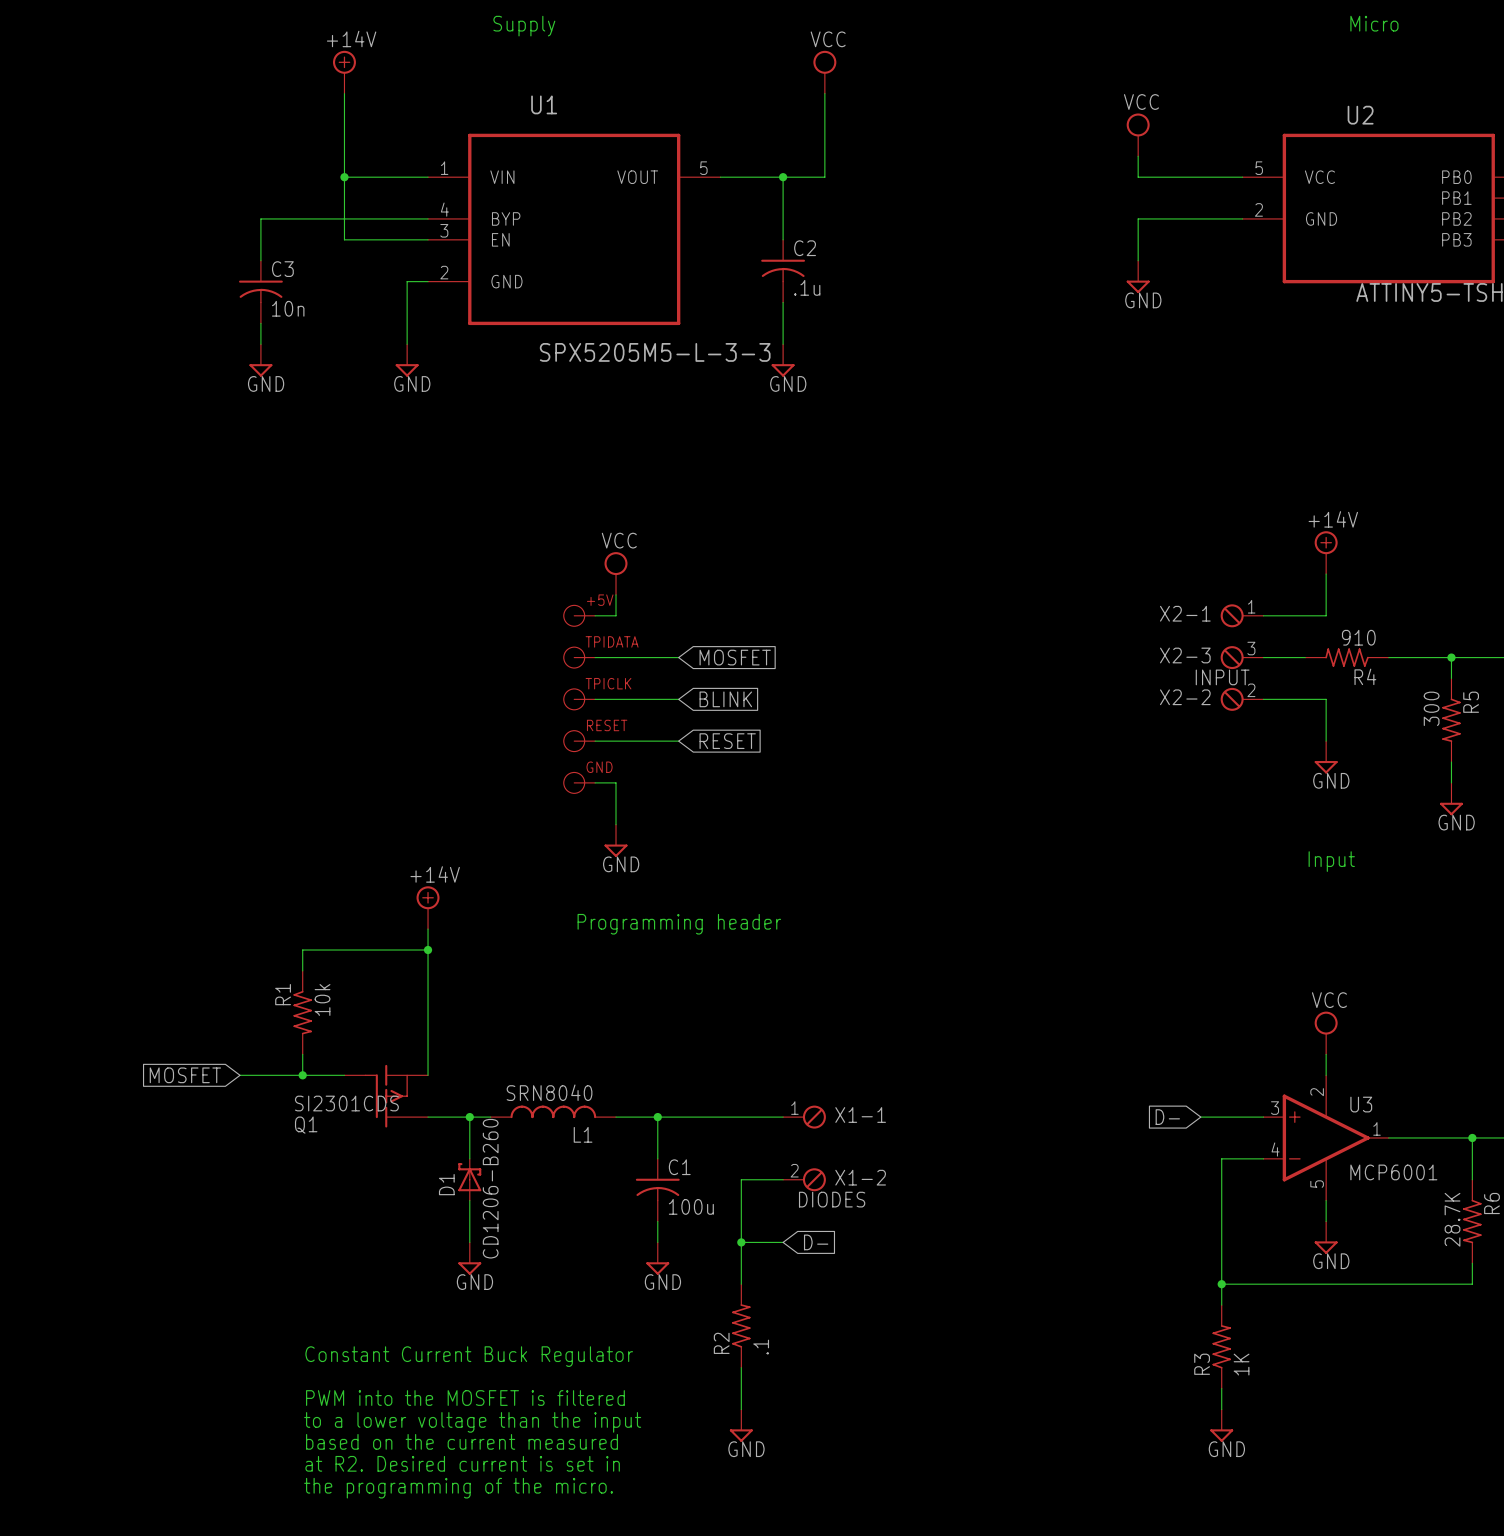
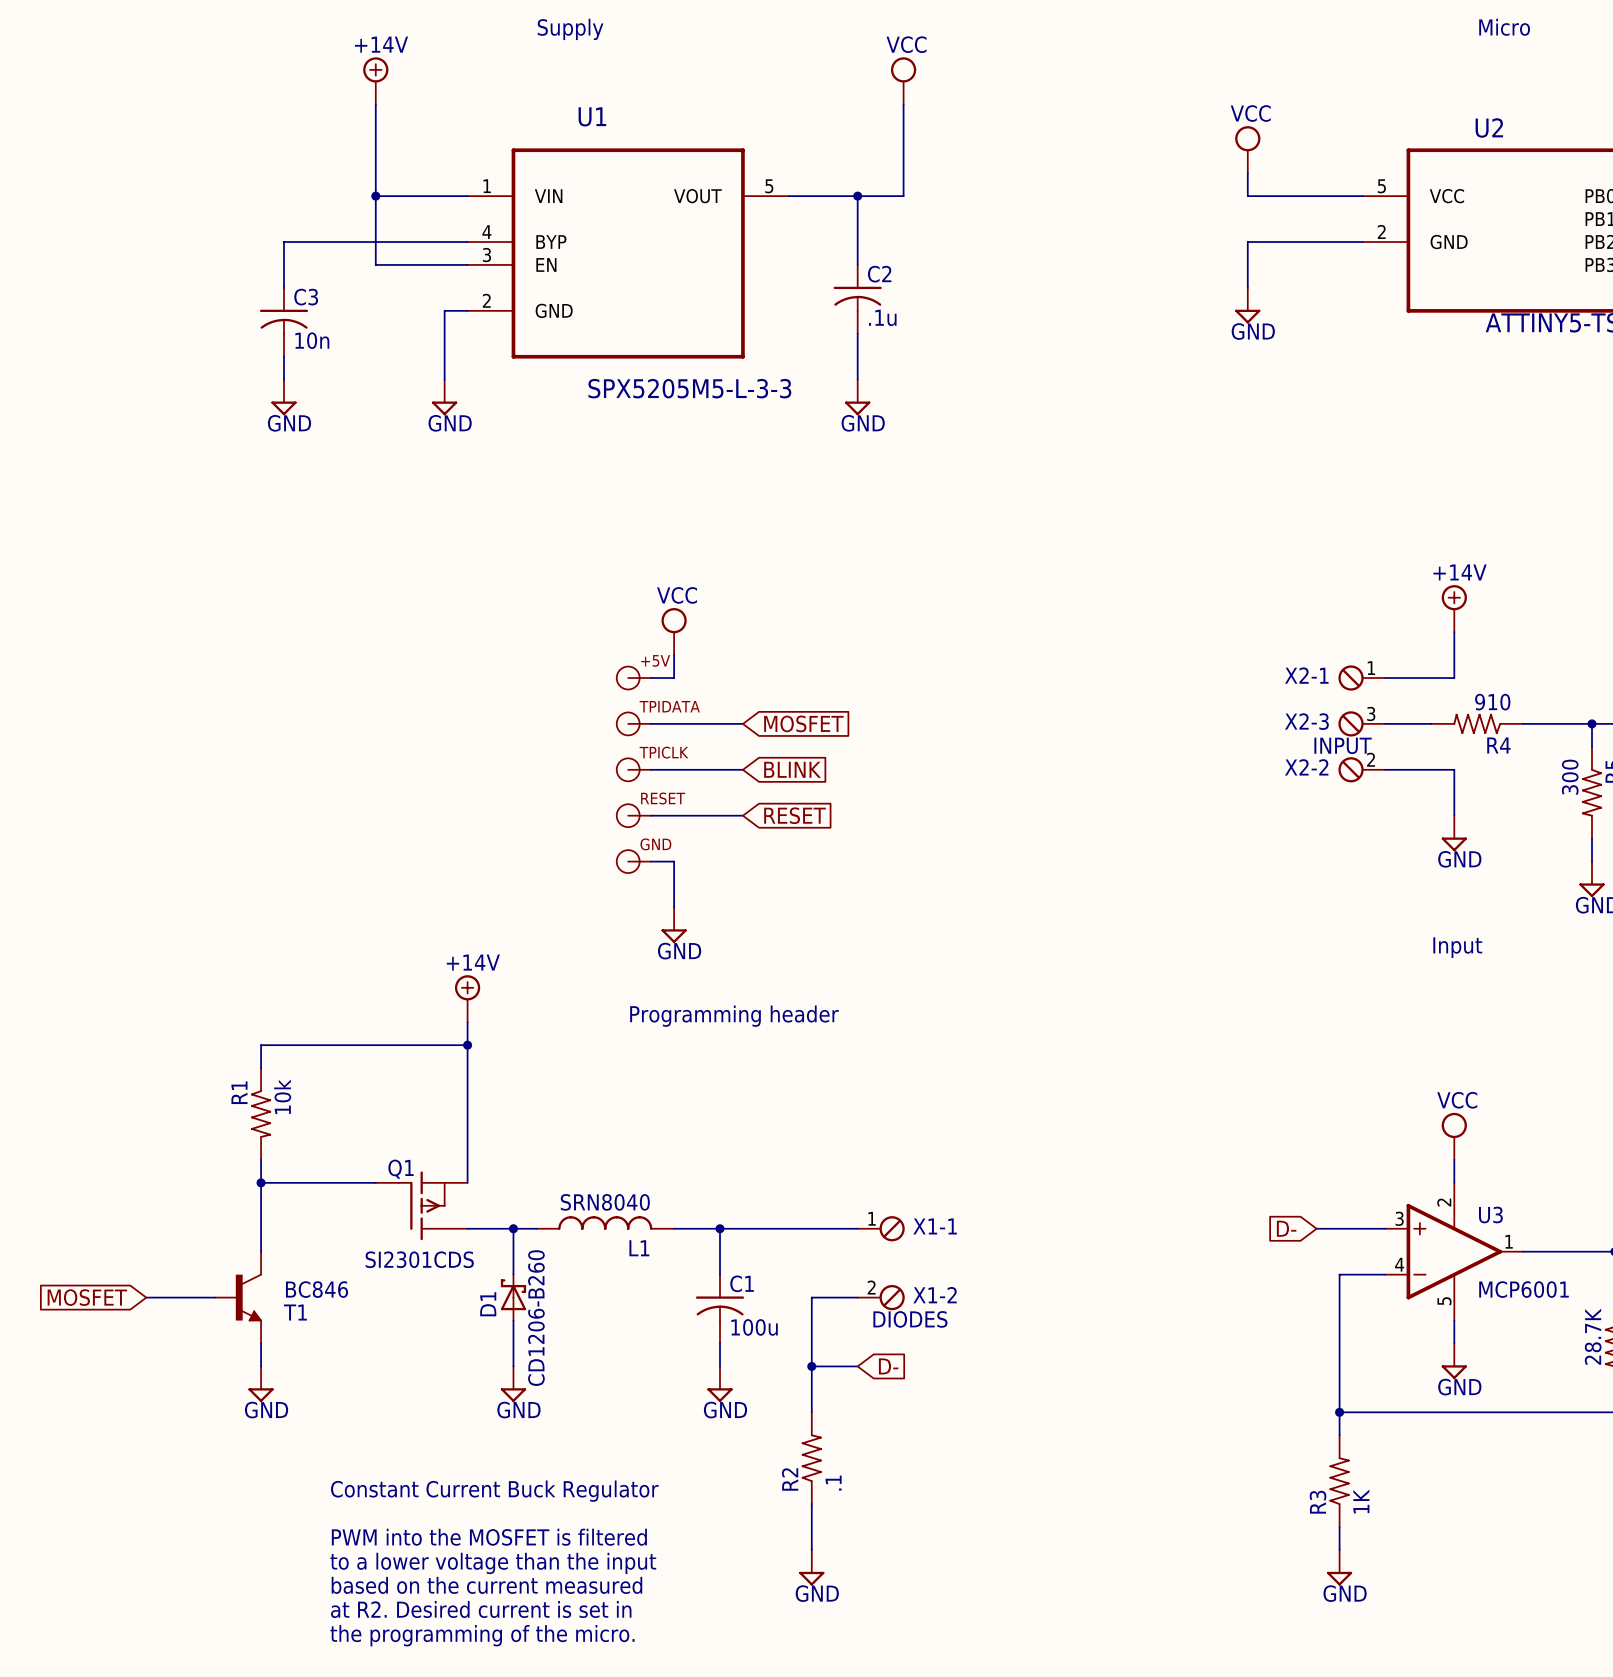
wire: (302, 950) (302, 970) -> (329, 1045) (261, 1045) (261, 1068)
R1 position: (302, 1012) -> (261, 1114)
wire: none -> (261, 1159) (261, 1251)
wire: (302, 1054) (302, 1075) -> (261, 1343) (261, 1366)
global label position: MOSFET (185, 1075) -> MOSFET (87, 1297)
junction: none -> (261, 1182)
junction: (302, 1075) -> none
Q1 value position: SI2301CDS (346, 1103) -> SI2301CDS (419, 1259)
Q1 name position: Q1 (306, 1125) -> Q1 (401, 1169)
wire: none -> (146, 1297) (215, 1297)
T1: none -> BC846 (238, 1297)
power symbol: none -> GND (261, 1384)

